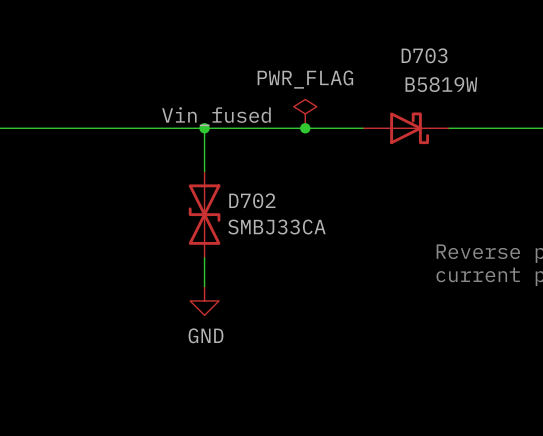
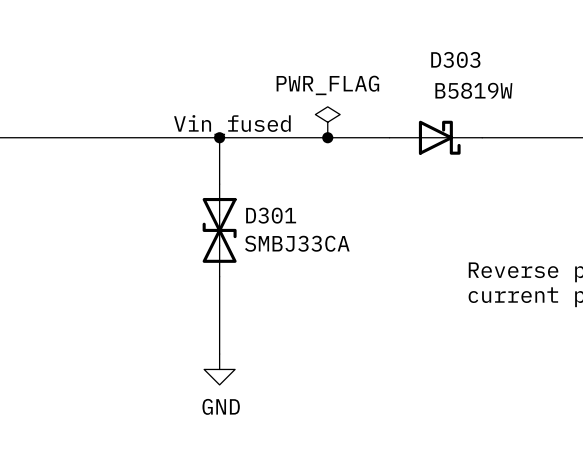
D703 name: D703 (424, 55) -> D303 (455, 59)
D702 name: D702 (252, 200) -> D301 (271, 215)
wire: none -> (219, 307) (219, 354)
power symbol position: GND (204, 300) -> GND (219, 369)

